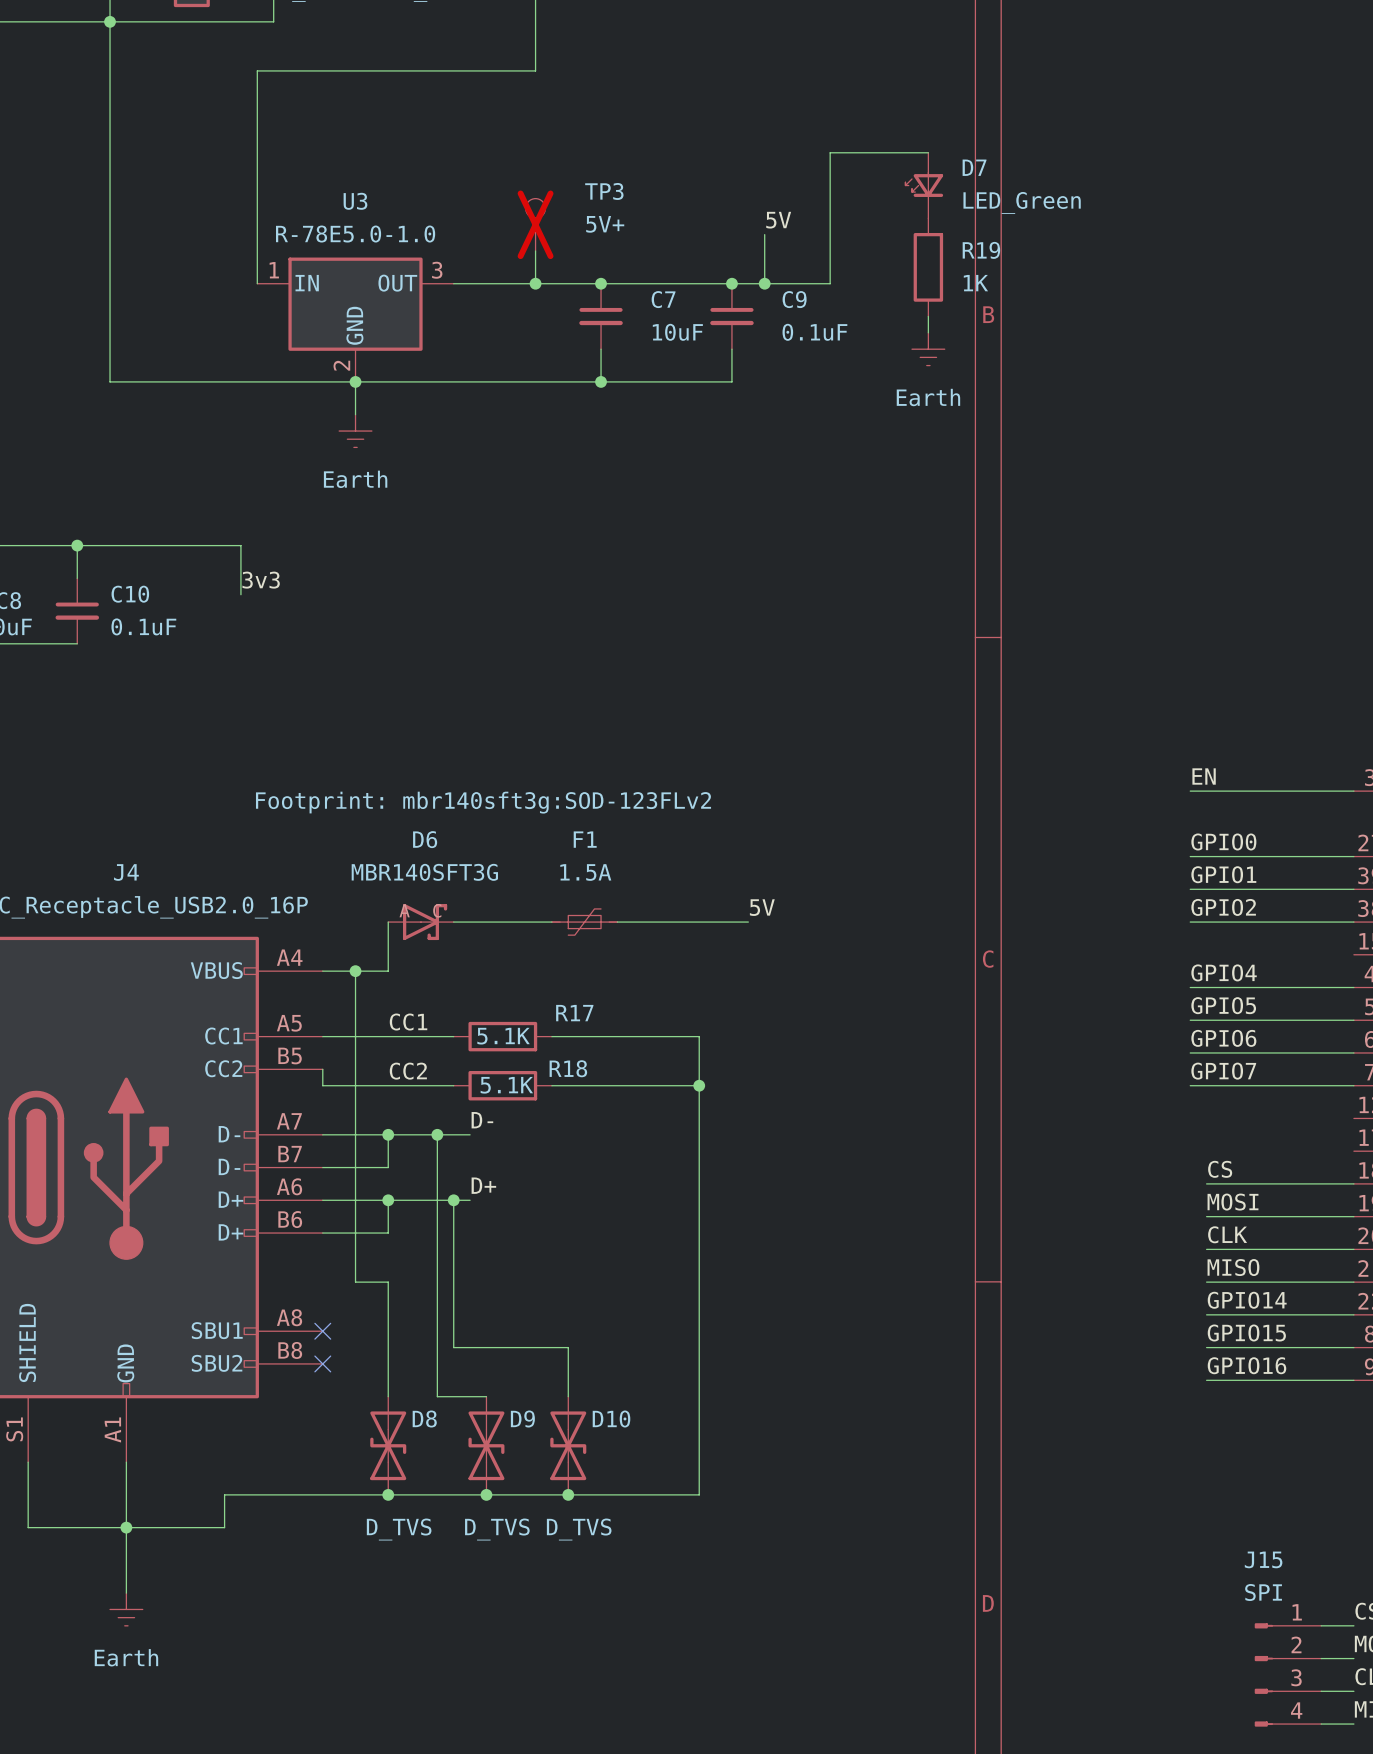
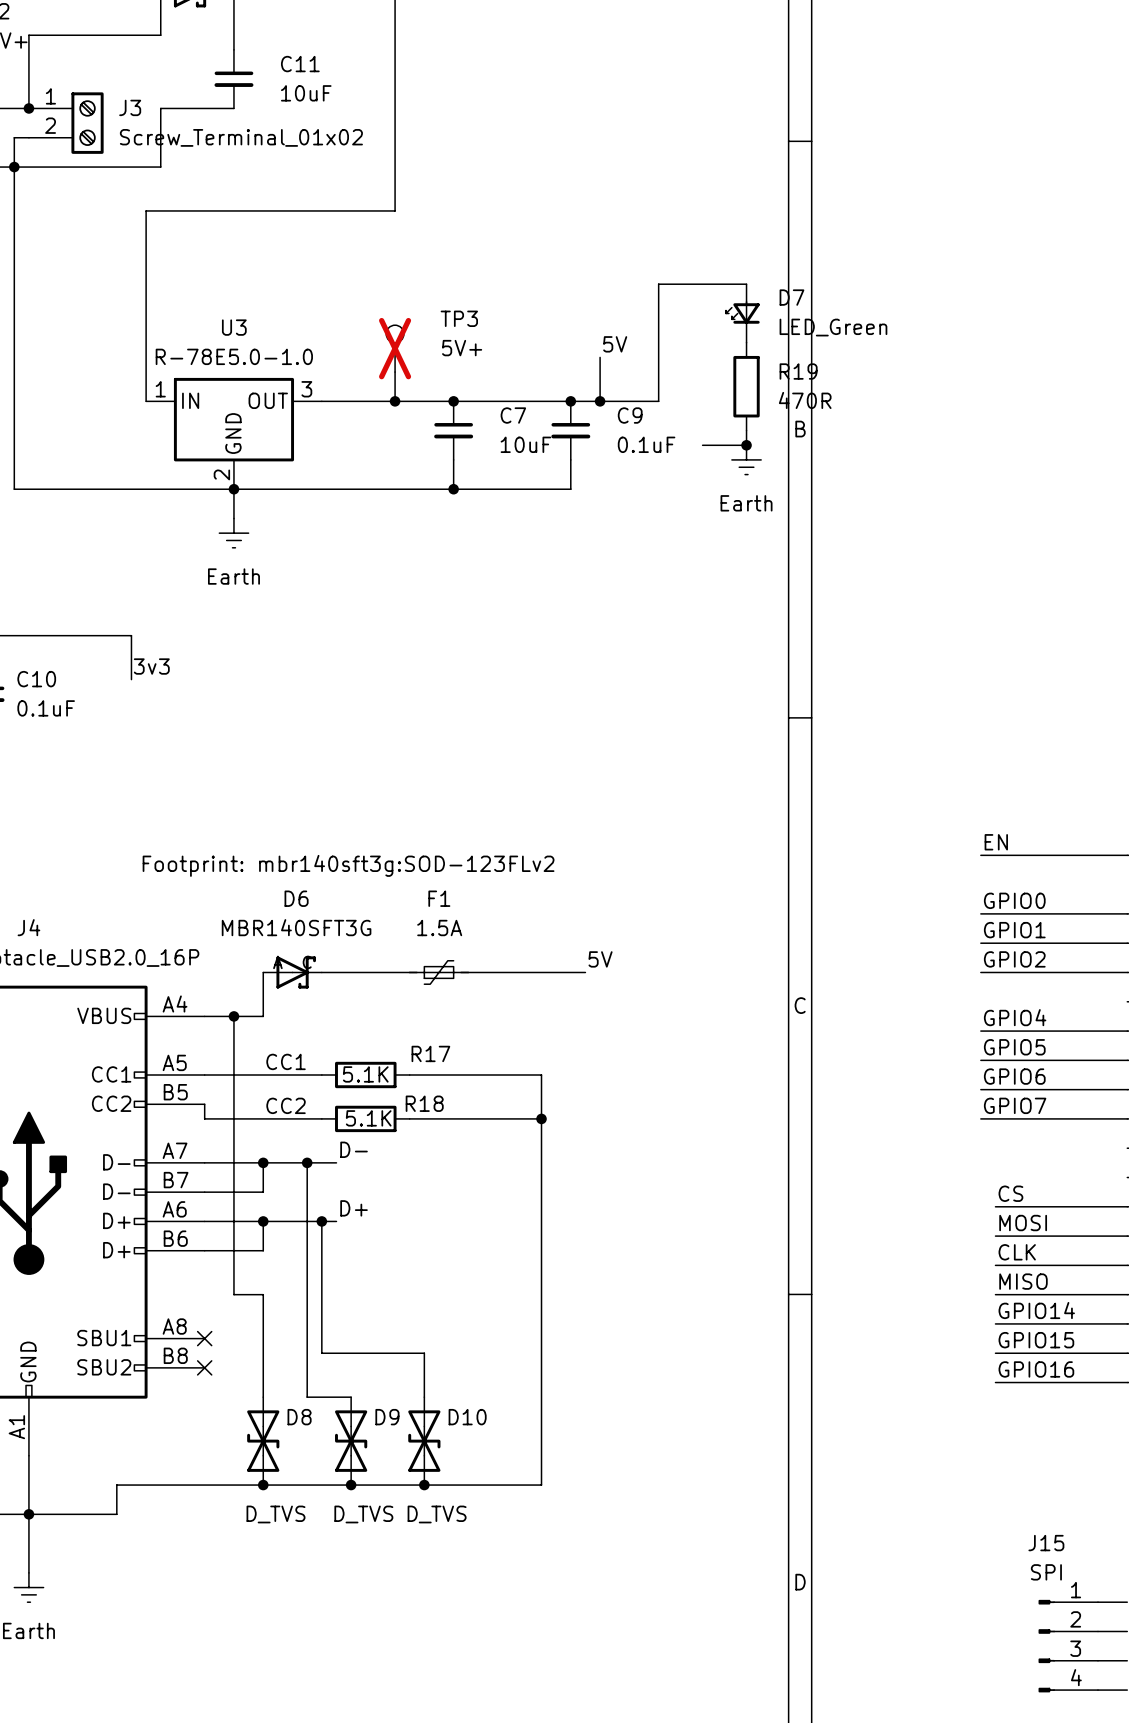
R19 value: 1K (975, 283) -> 470R (805, 400)
wire: none -> (702, 445) (746, 445)
junction: none -> (746, 445)

